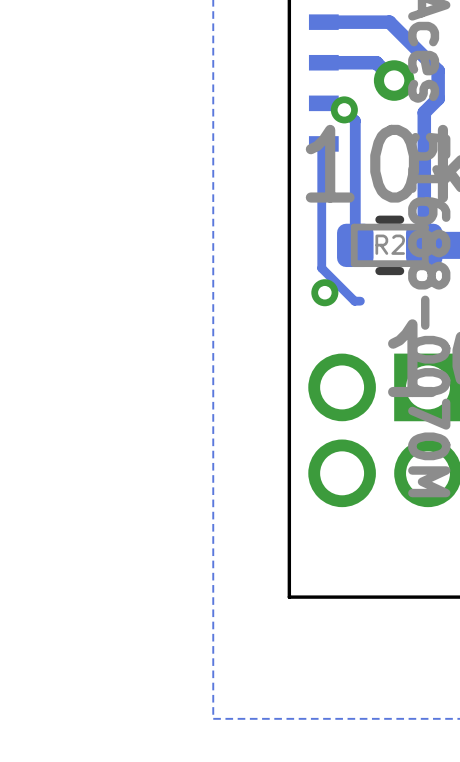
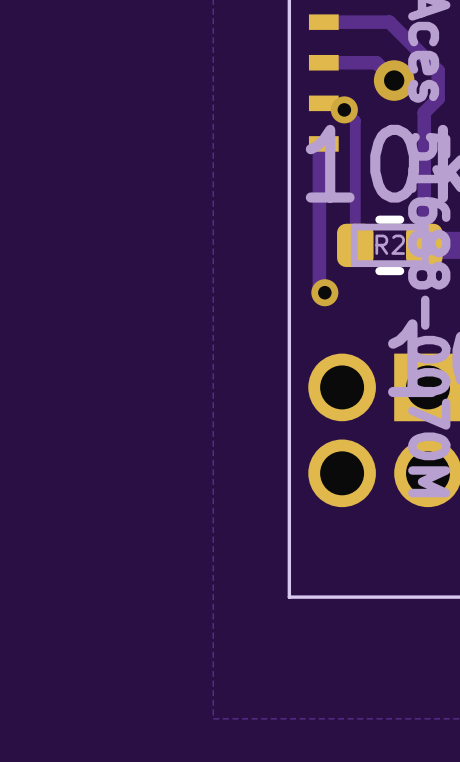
track: none -> (323, 143) (319, 148) (319, 287) (324, 292)
track: (321, 146) (321, 268) (354, 301) (360, 301) -> none

